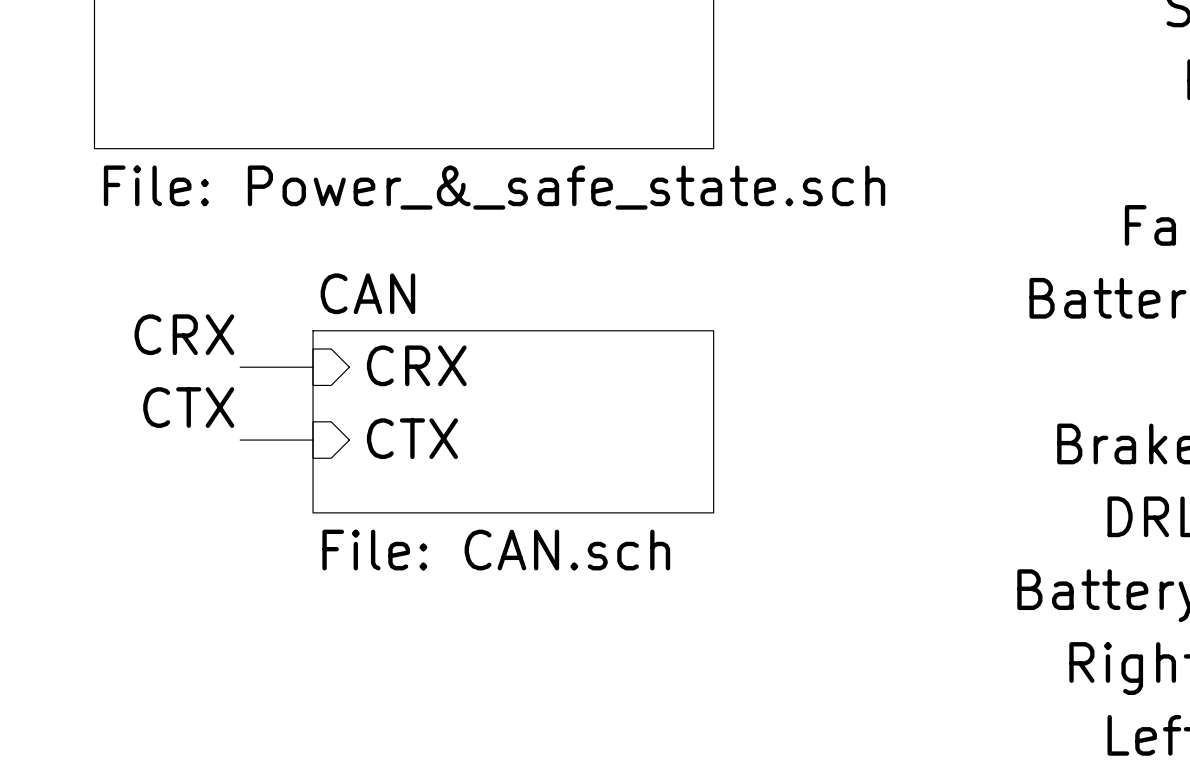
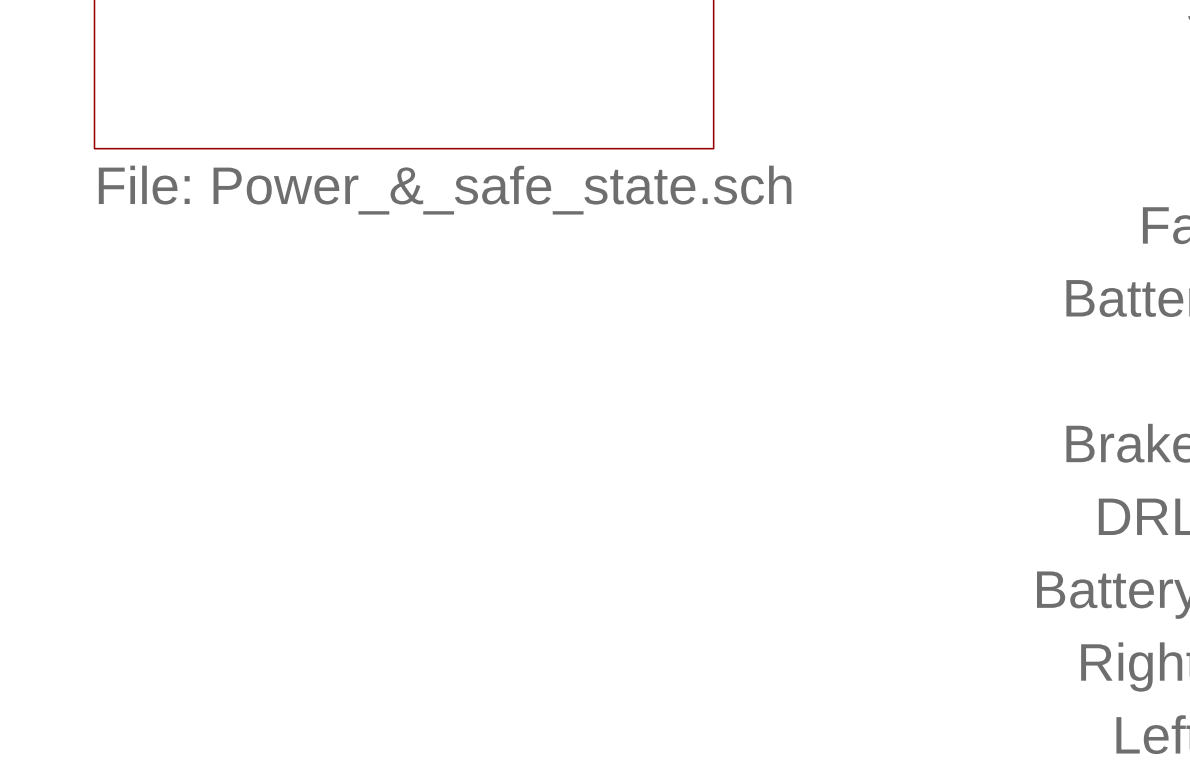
label: CRX (184, 334) -> none
sheet pin: CRX (416, 365) -> none
wire: (240, 367) (313, 367) -> none
label: CTX (188, 407) -> none
sheet CAN: File: CAN.sch (513, 421) -> none
sheet pin: CTX (412, 438) -> none
wire: (240, 440) (313, 440) -> none

